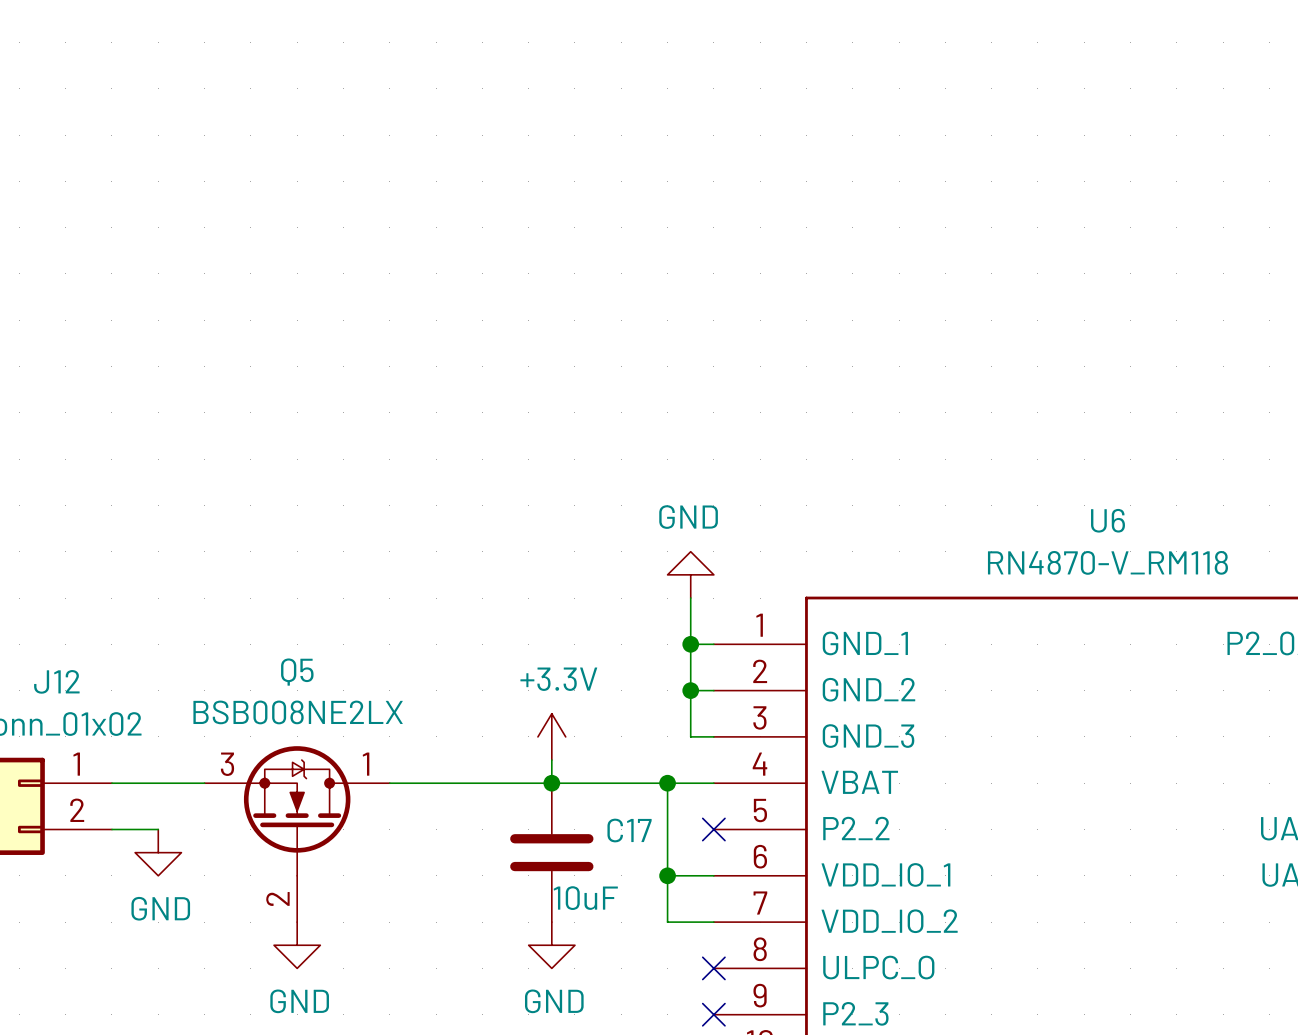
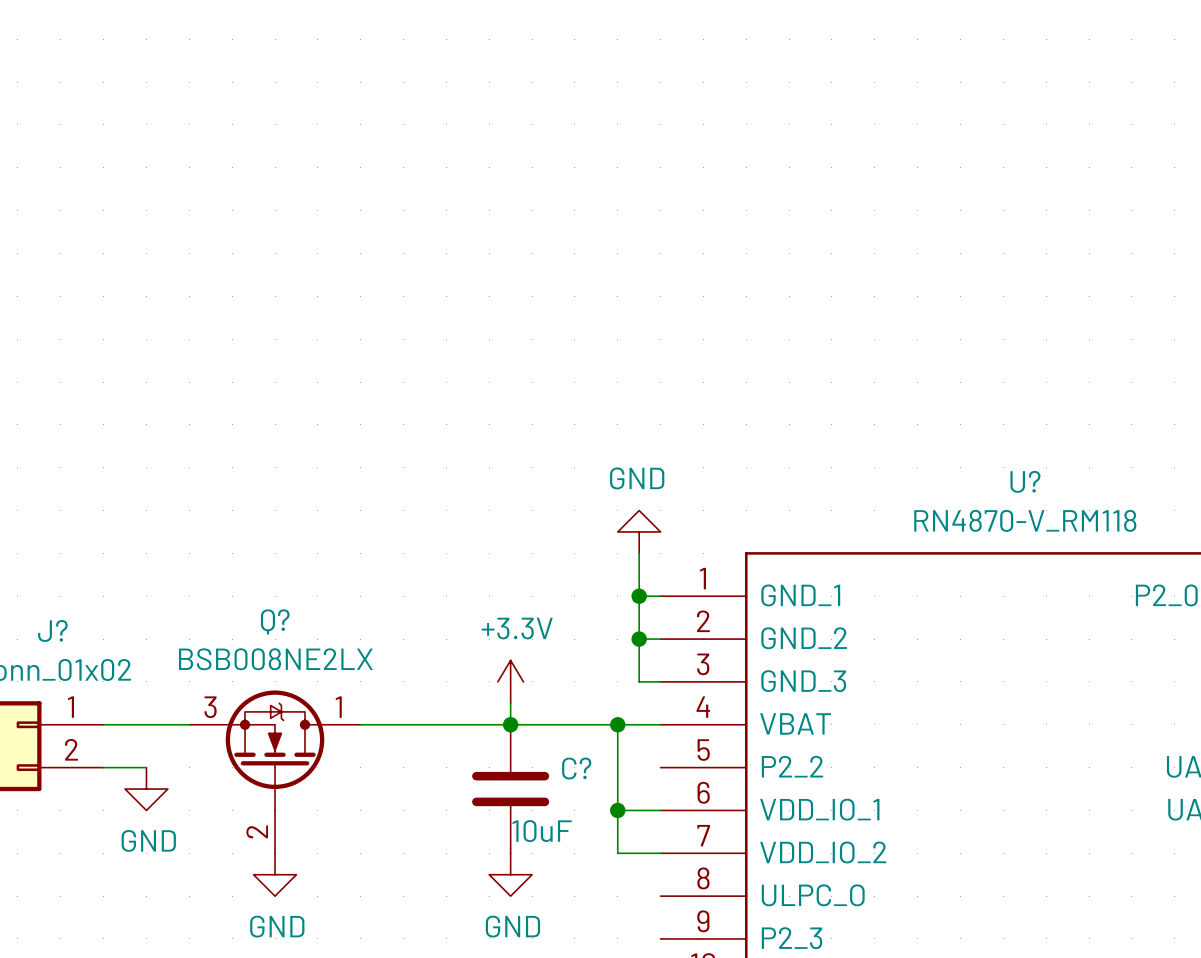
U6 name: U6 (1108, 520) -> U? (1025, 481)
Q5 name: Q5 (297, 672) -> Q? (275, 621)
J12 name: J12 (56, 681) -> J? (52, 630)
no-connect mark: (713, 829) -> none
C17 name: C17 (629, 830) -> C? (576, 768)
no-connect mark: (713, 968) -> none
no-connect mark: (713, 1014) -> none

